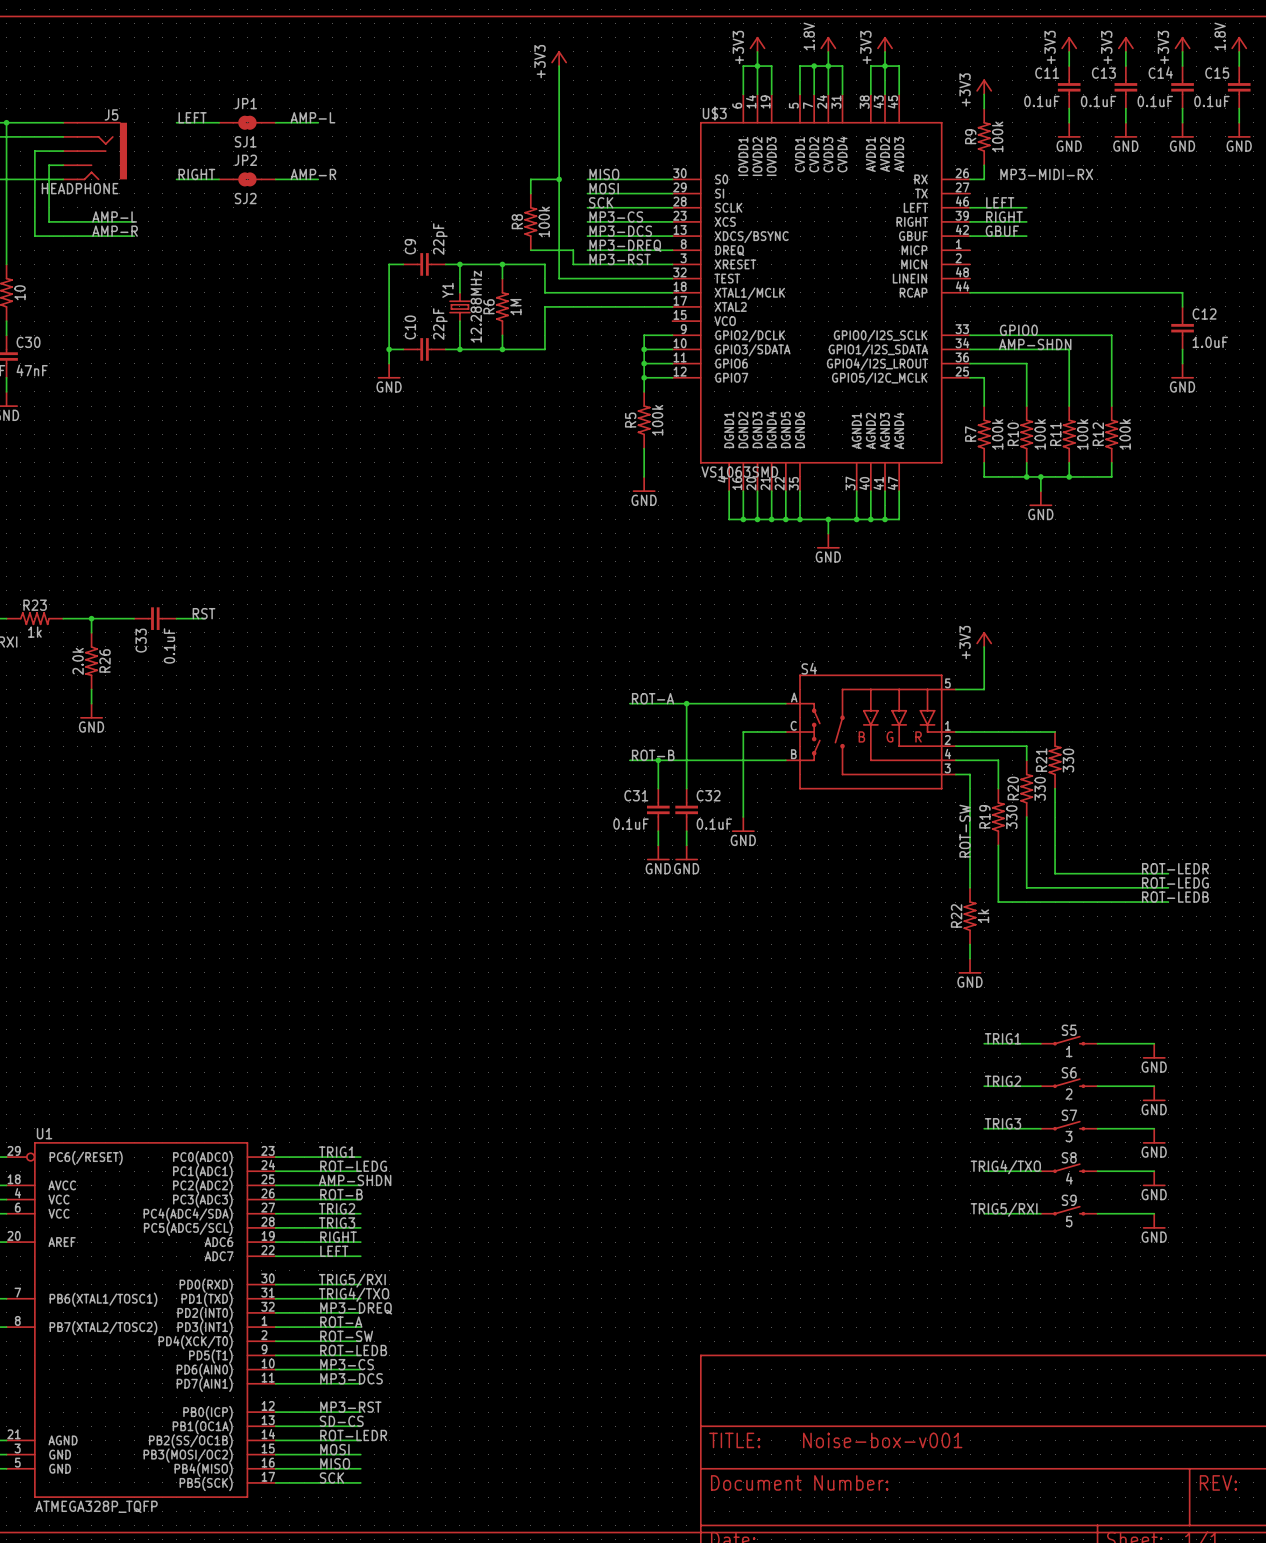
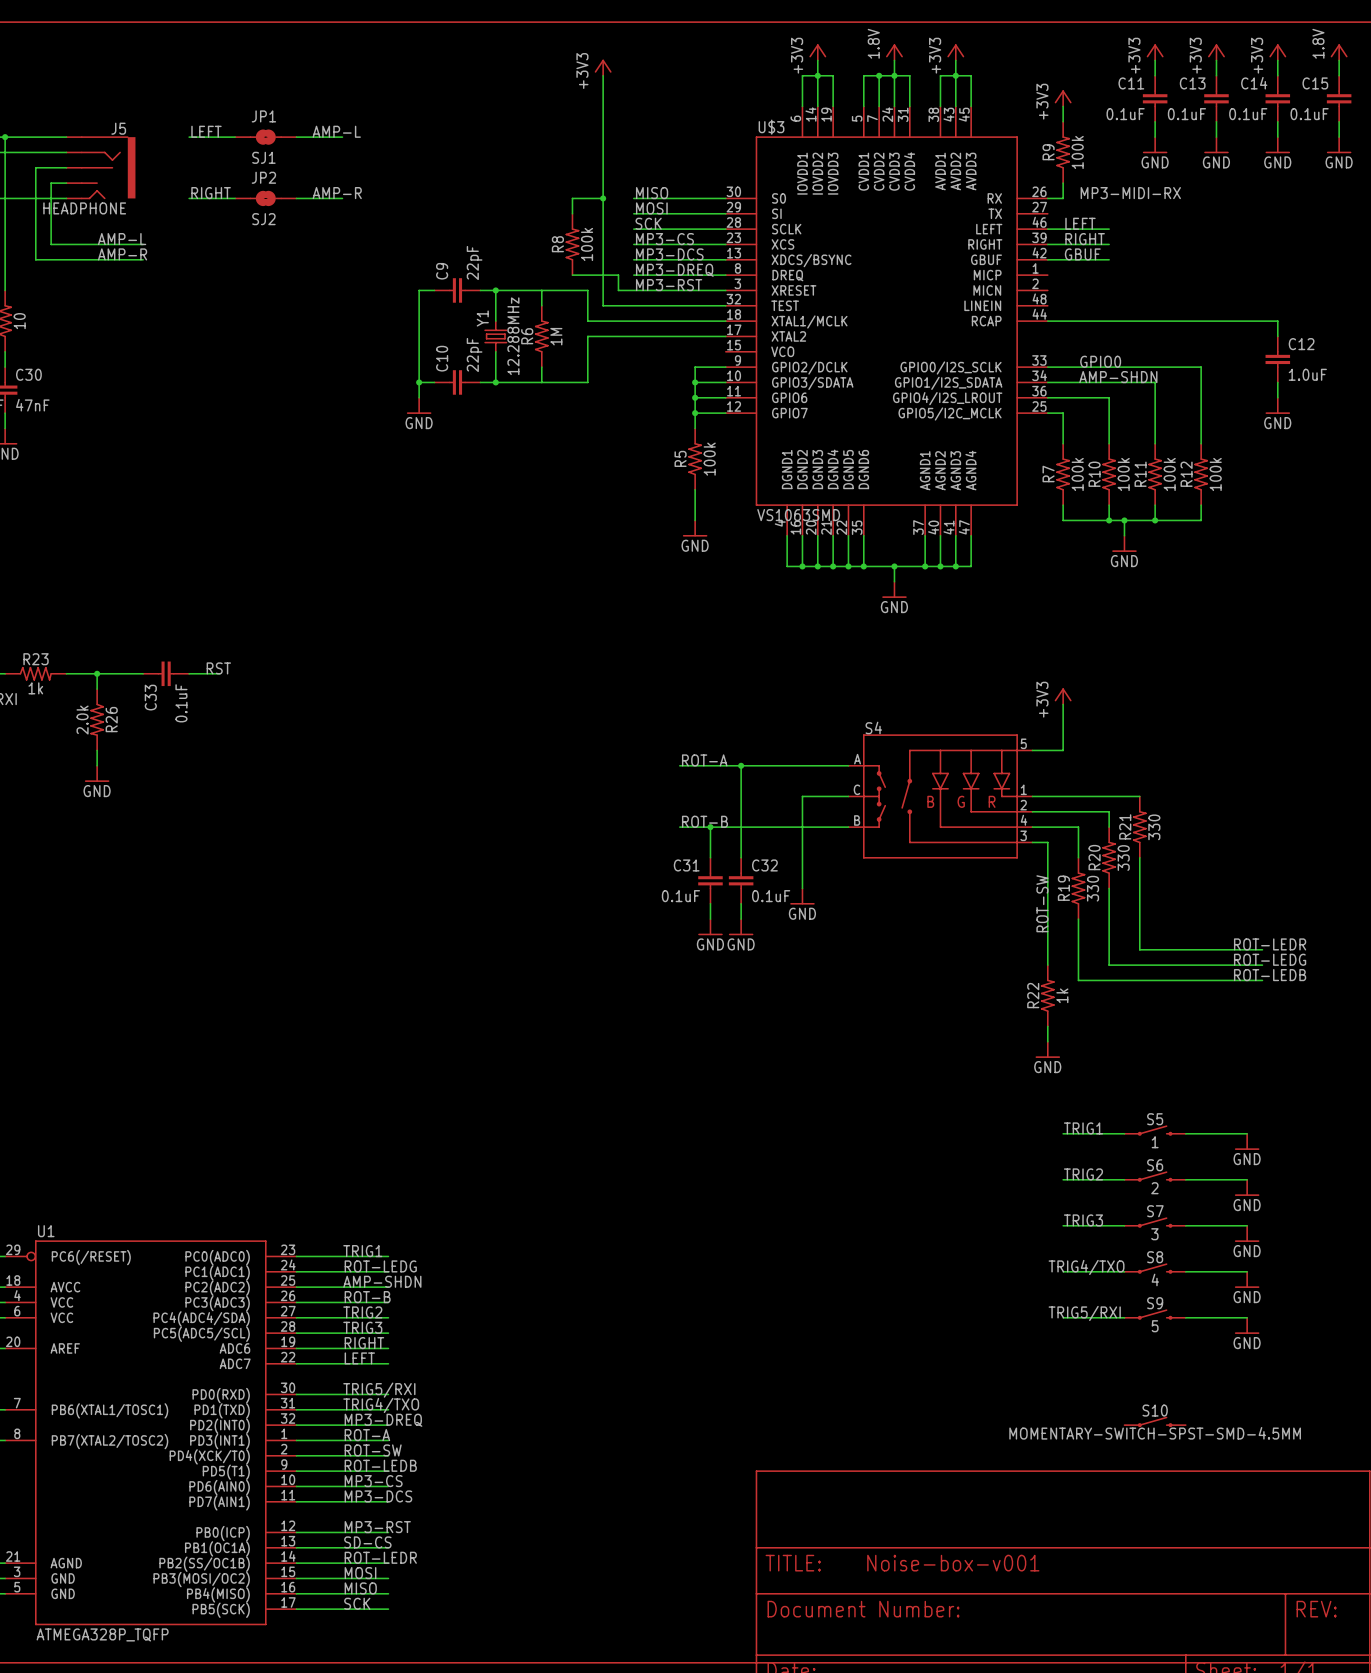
junction: (502, 264) -> none
junction: (502, 349) -> none
S10: none -> MOMENTARY-SWITCH-SPST-SMD-4.5MM (1155, 1421)

